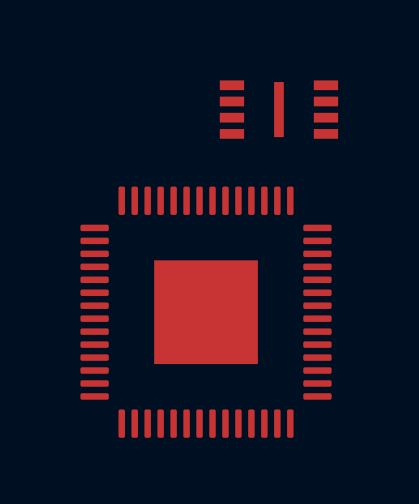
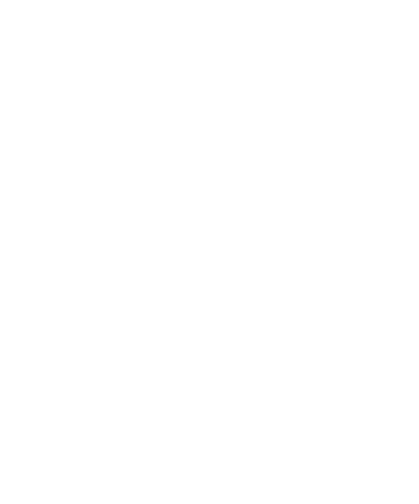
part: (278, 109) -> none
part: (206, 312) -> none

